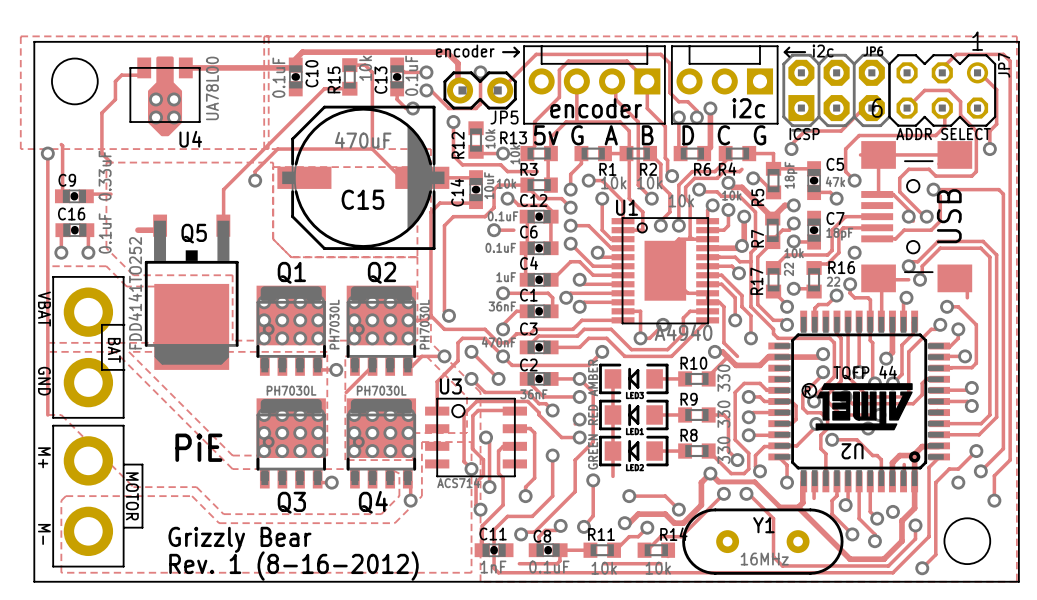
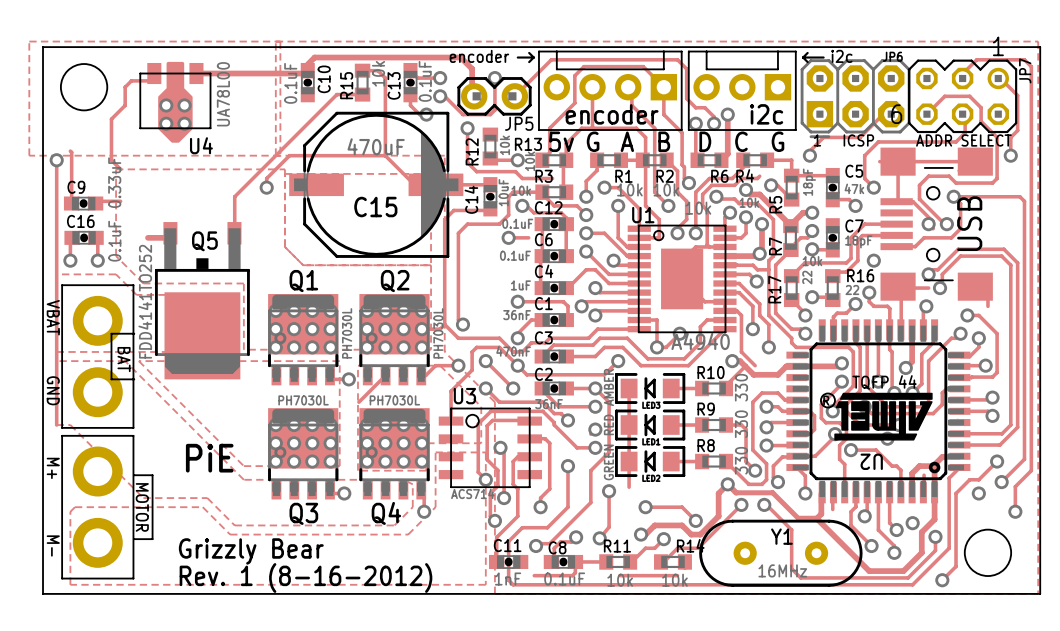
text: none -> 1 (817, 140)
text position: ICSP (804, 134) -> ICSP (858, 140)

